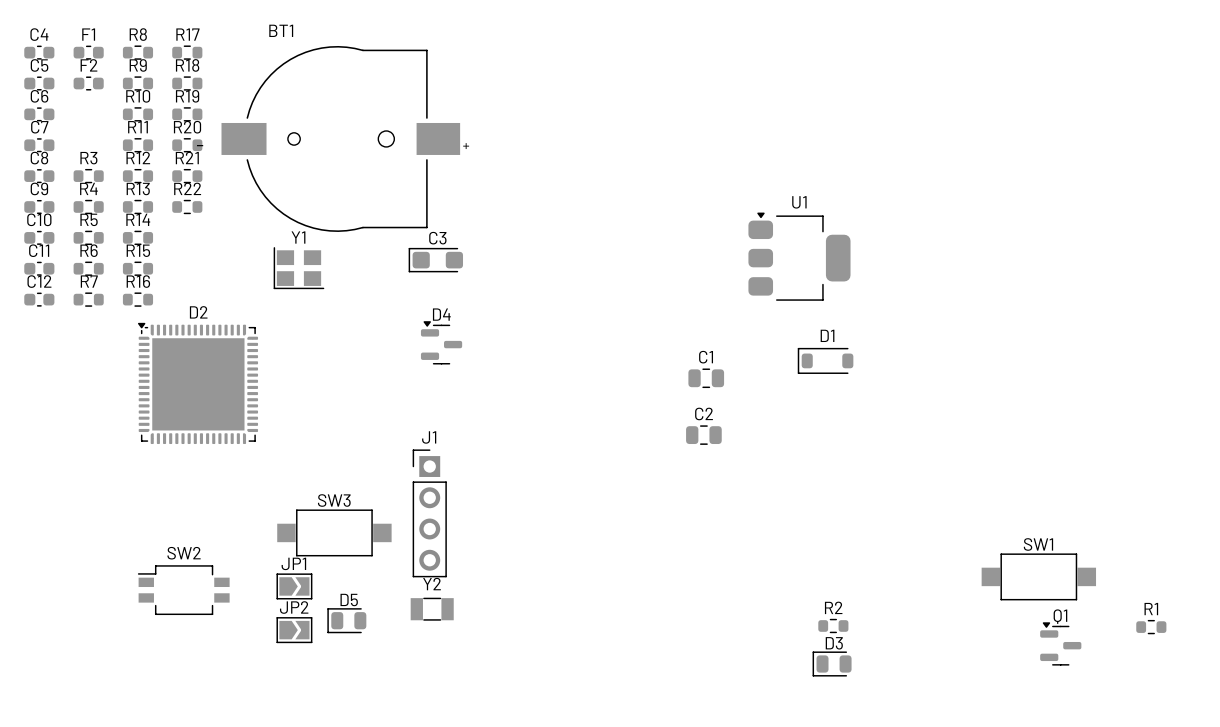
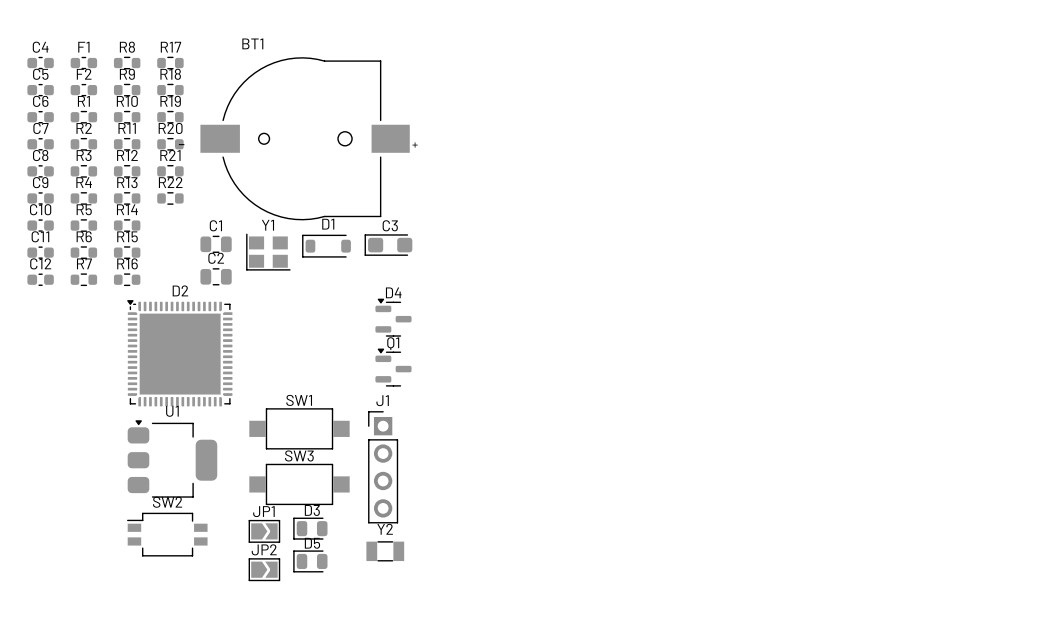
U1 position: (799, 256) -> (172, 458)
D1 position: (825, 360) -> (326, 246)
C1 position: (706, 378) -> (216, 244)
C2 position: (703, 435) -> (216, 276)
SW1 position: (1038, 576) -> (299, 428)
R2 position: (833, 625) -> (83, 144)
R1 position: (1151, 627) -> (83, 117)
Q1 position: (1060, 643) -> (393, 367)
D3 position: (832, 664) -> (310, 528)

